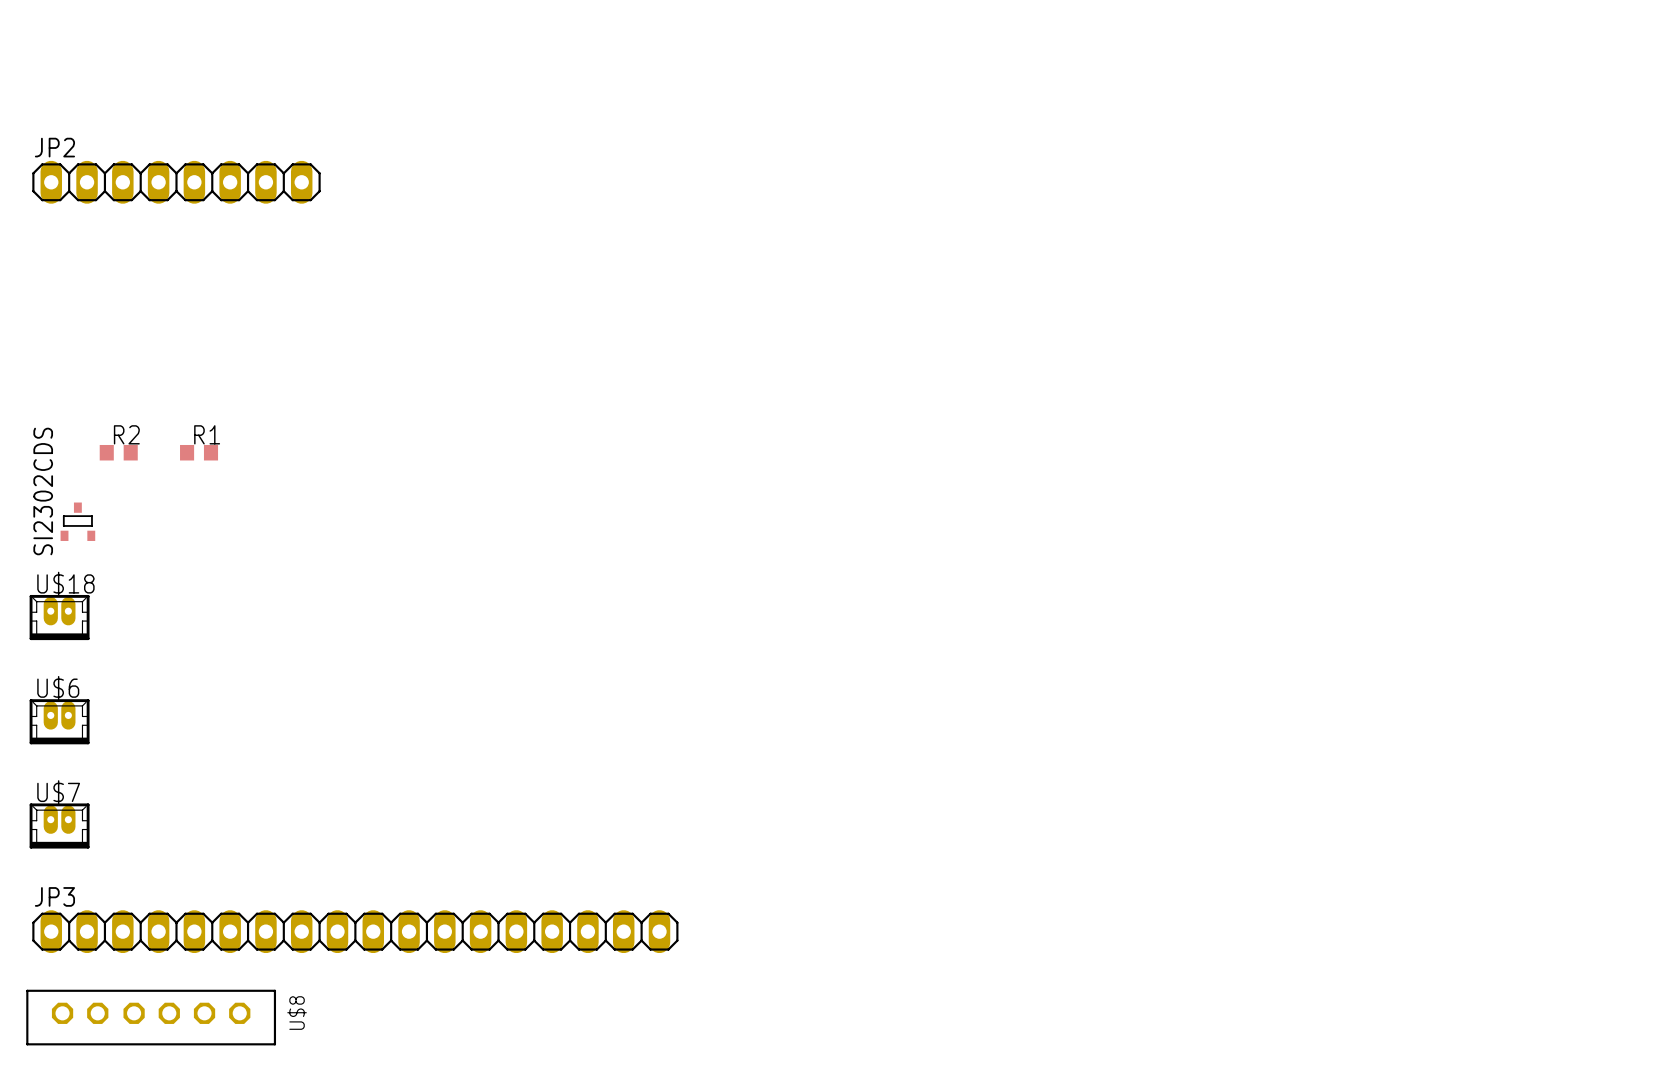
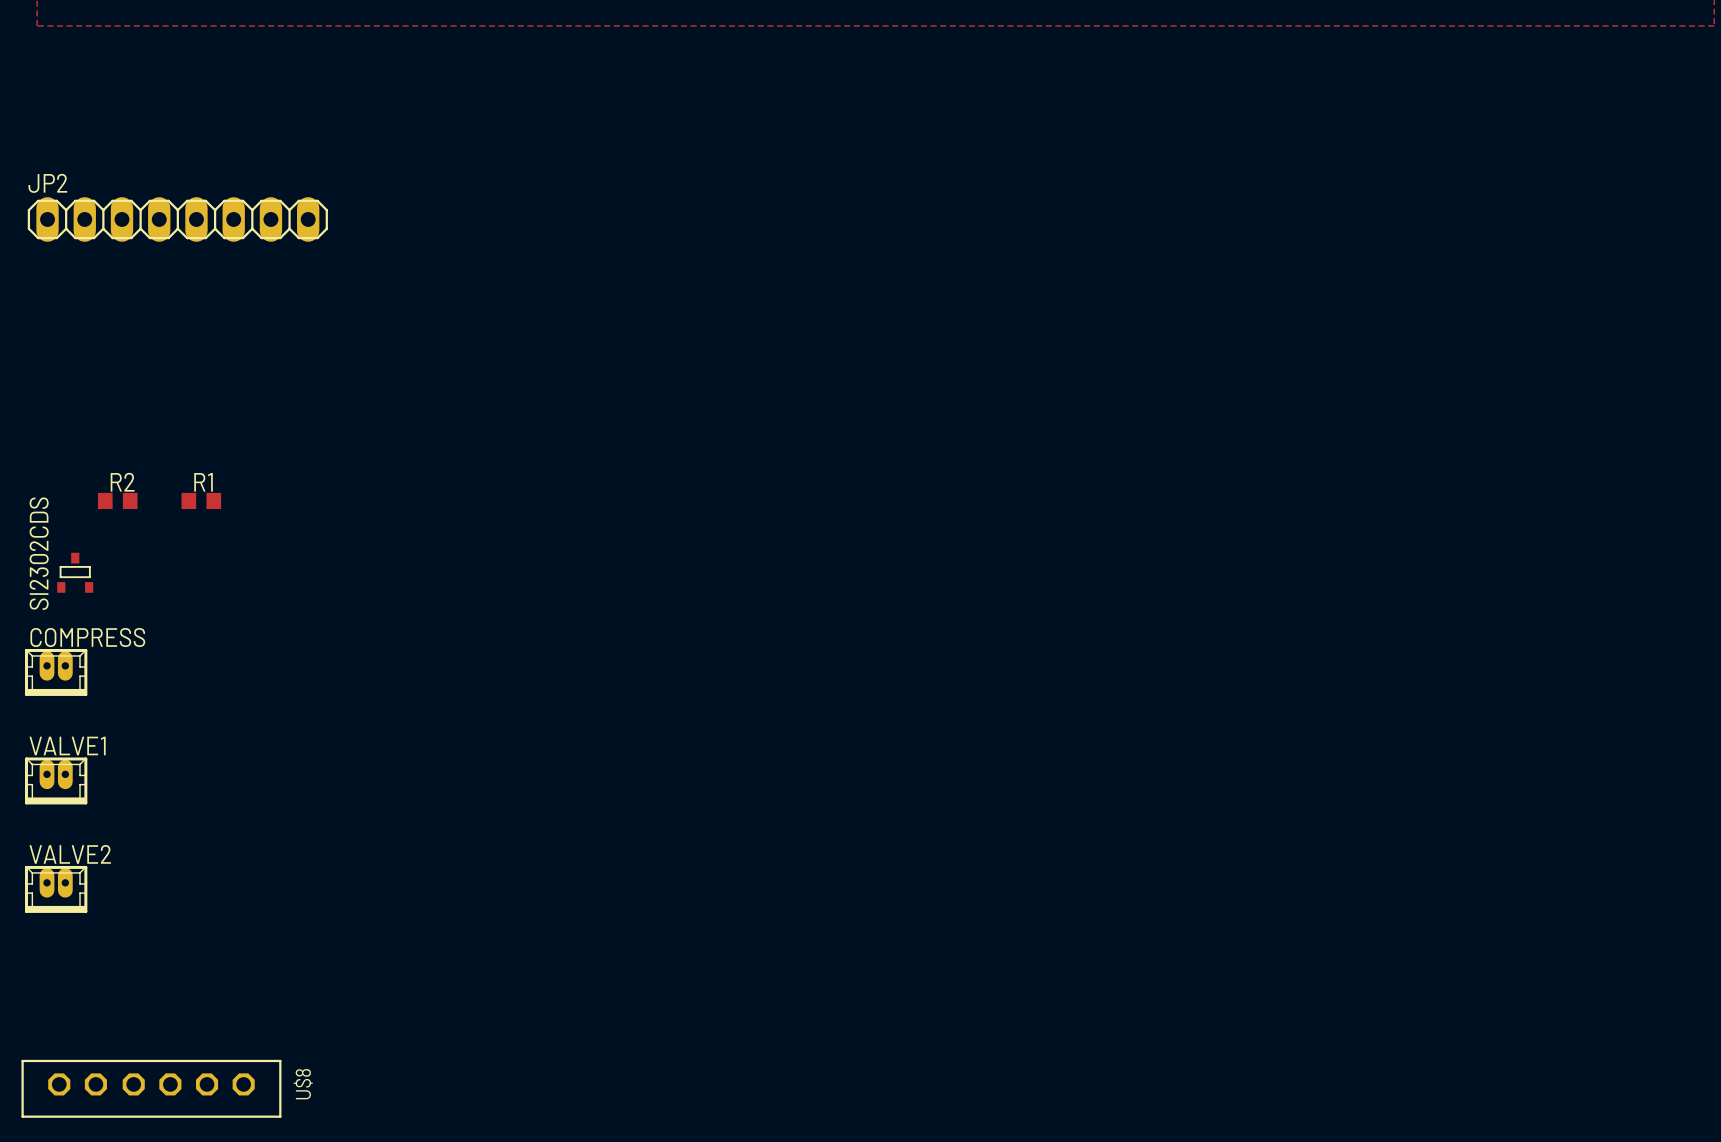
U$18 name: U$18 (65, 583) -> COMPRESS (87, 637)
U$6 name: U$6 (58, 688) -> VALVE1 (67, 745)
U$7 name: U$7 (58, 792) -> VALVE2 (70, 854)
JP3: (355, 931) -> none

